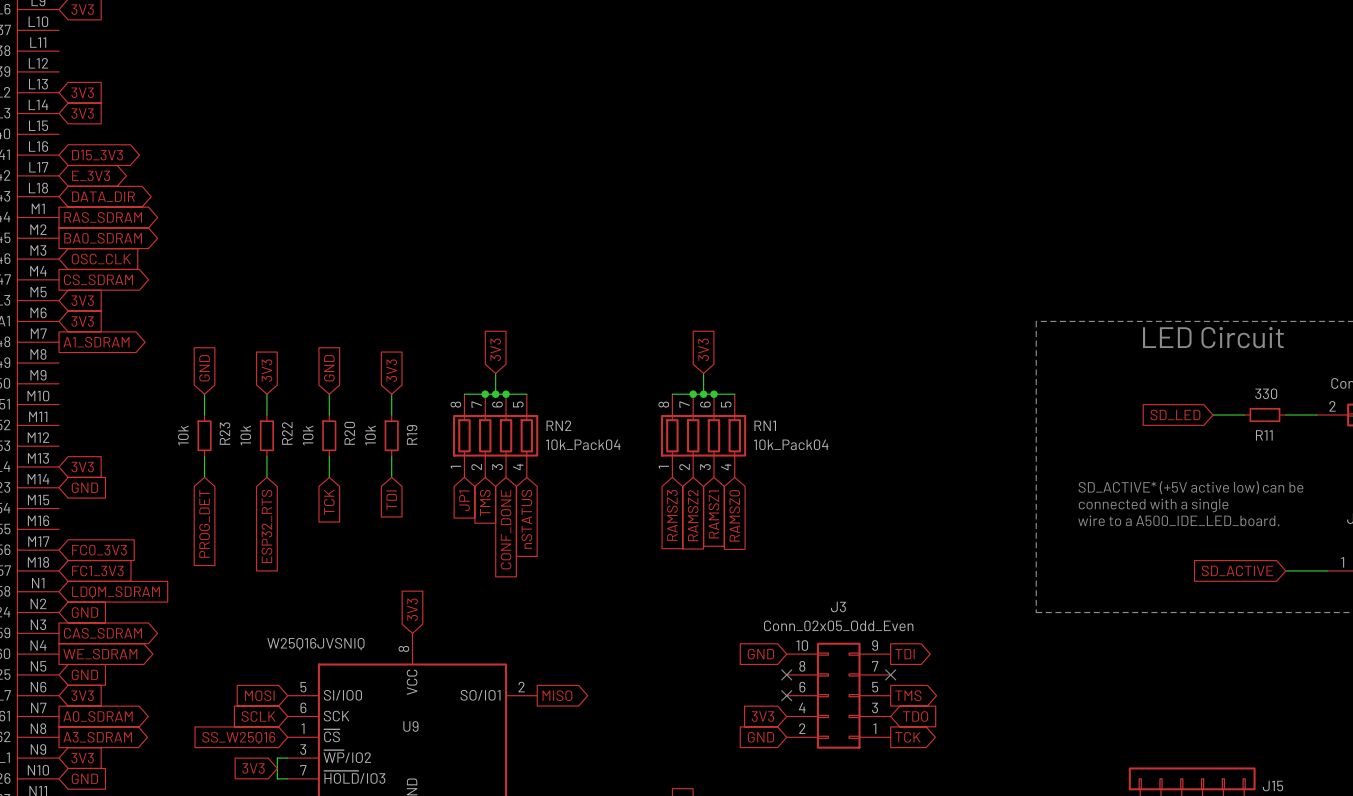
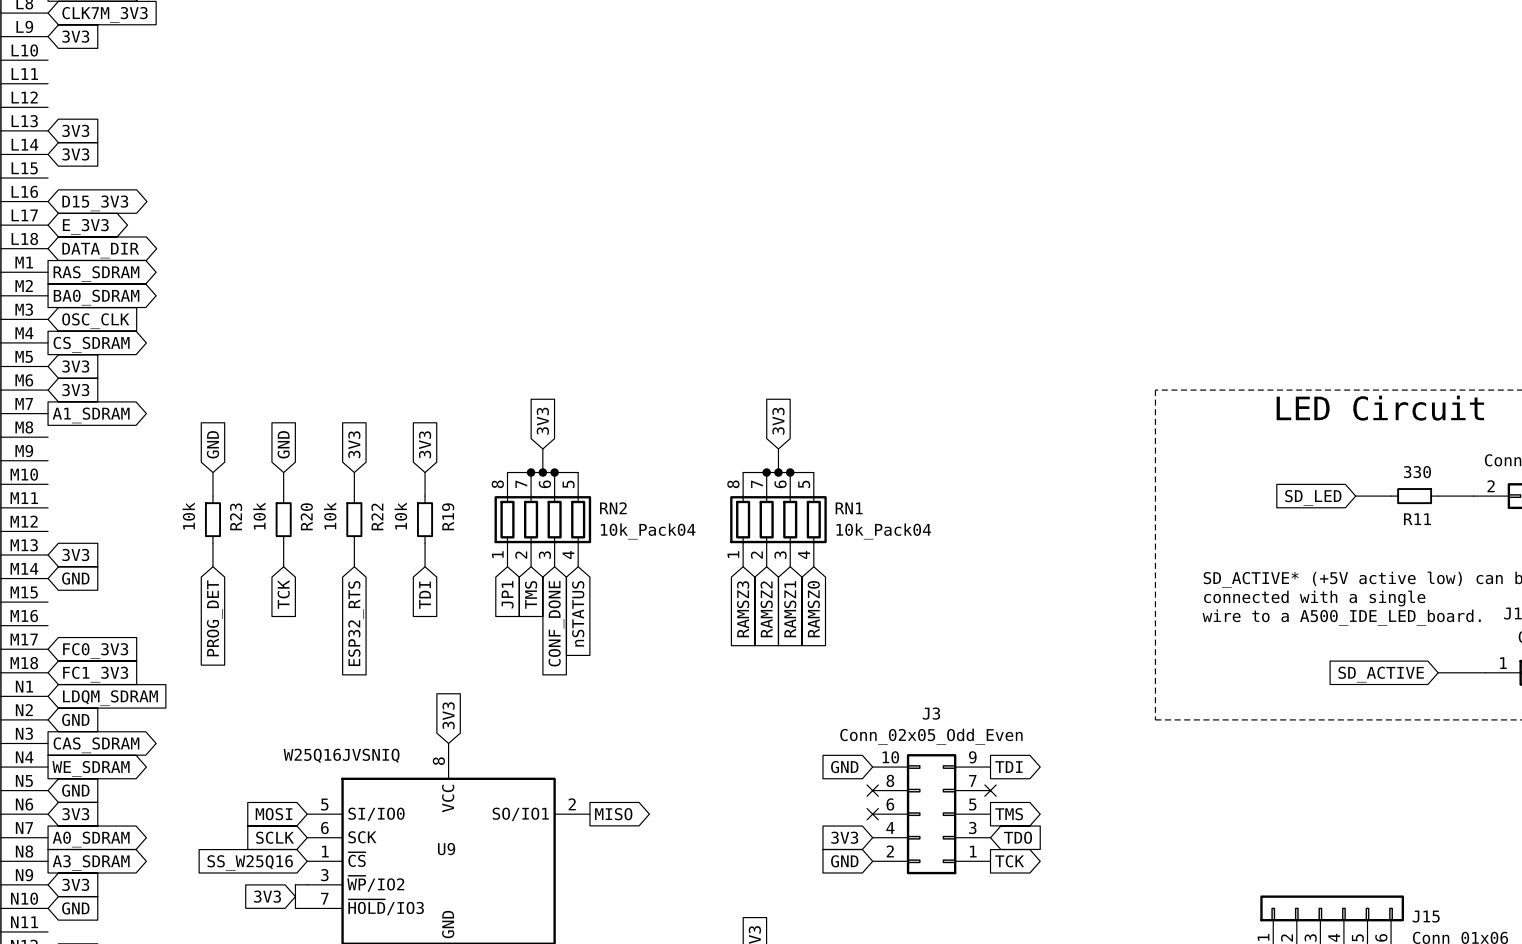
global label: GND (329, 368) -> 3V3 (354, 444)
global label: 3V3 (266, 370) -> GND (283, 444)
R22 name: R22 (287, 433) -> R20 (306, 516)
R20 name: R20 (349, 433) -> R22 (377, 516)
global label: TCK (329, 502) -> ESP32_RTS (356, 623)
global label: ESP32_RTS (266, 526) -> TCK (283, 594)

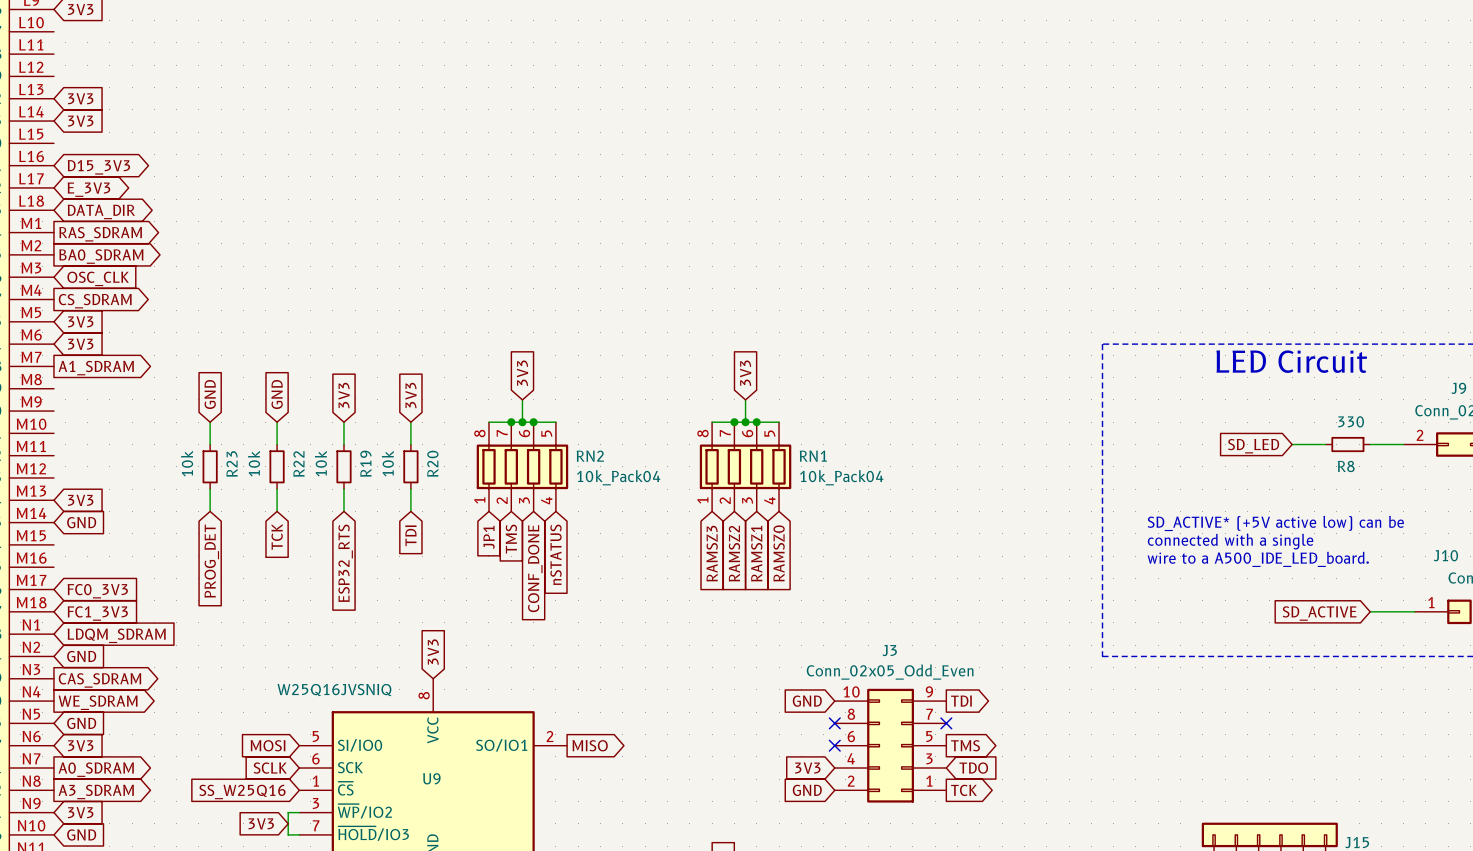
R20 name: R20 (306, 516) -> R22 (298, 463)
R22 name: R22 (377, 516) -> R19 (365, 463)
R19 name: R19 (448, 516) -> R20 (432, 463)
R11 name: R11 (1417, 519) -> R8 (1346, 466)

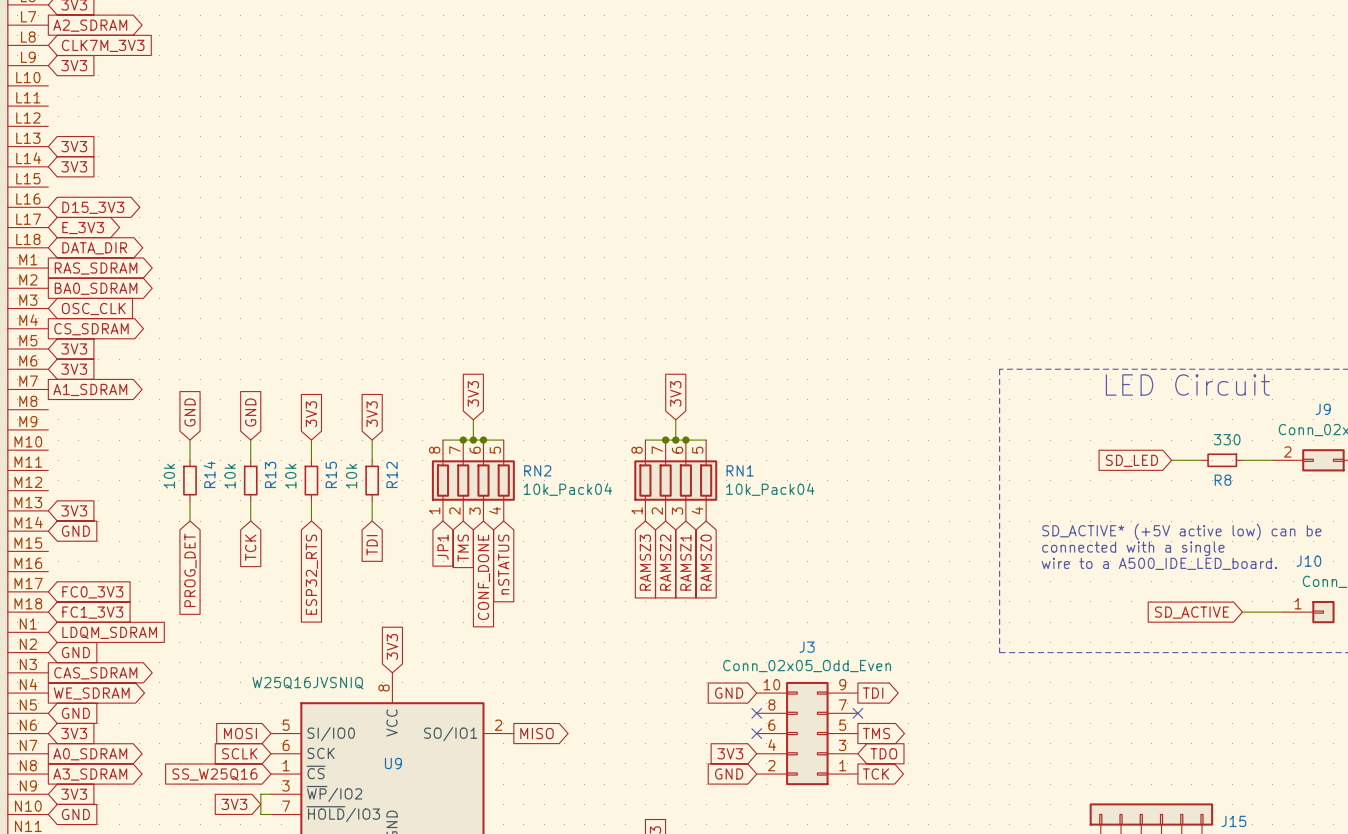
R23 name: R23 (232, 463) -> R14 (209, 474)
R22 name: R22 (298, 463) -> R13 (270, 474)
R19 name: R19 (365, 463) -> R15 (331, 474)
R20 name: R20 (432, 463) -> R12 (392, 474)

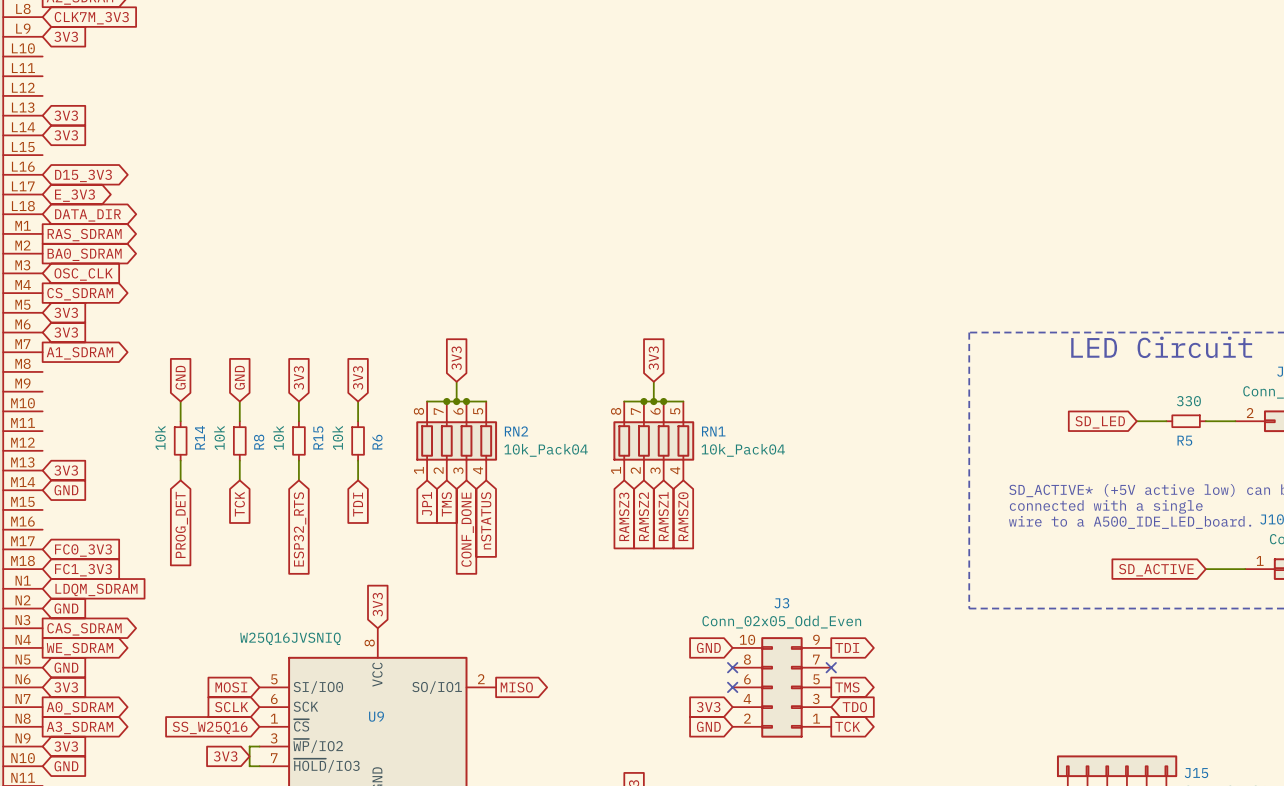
R13 name: R13 (270, 474) -> R8 (259, 442)
R12 name: R12 (392, 474) -> R6 (377, 442)
R8 name: R8 (1223, 480) -> R5 (1184, 440)

